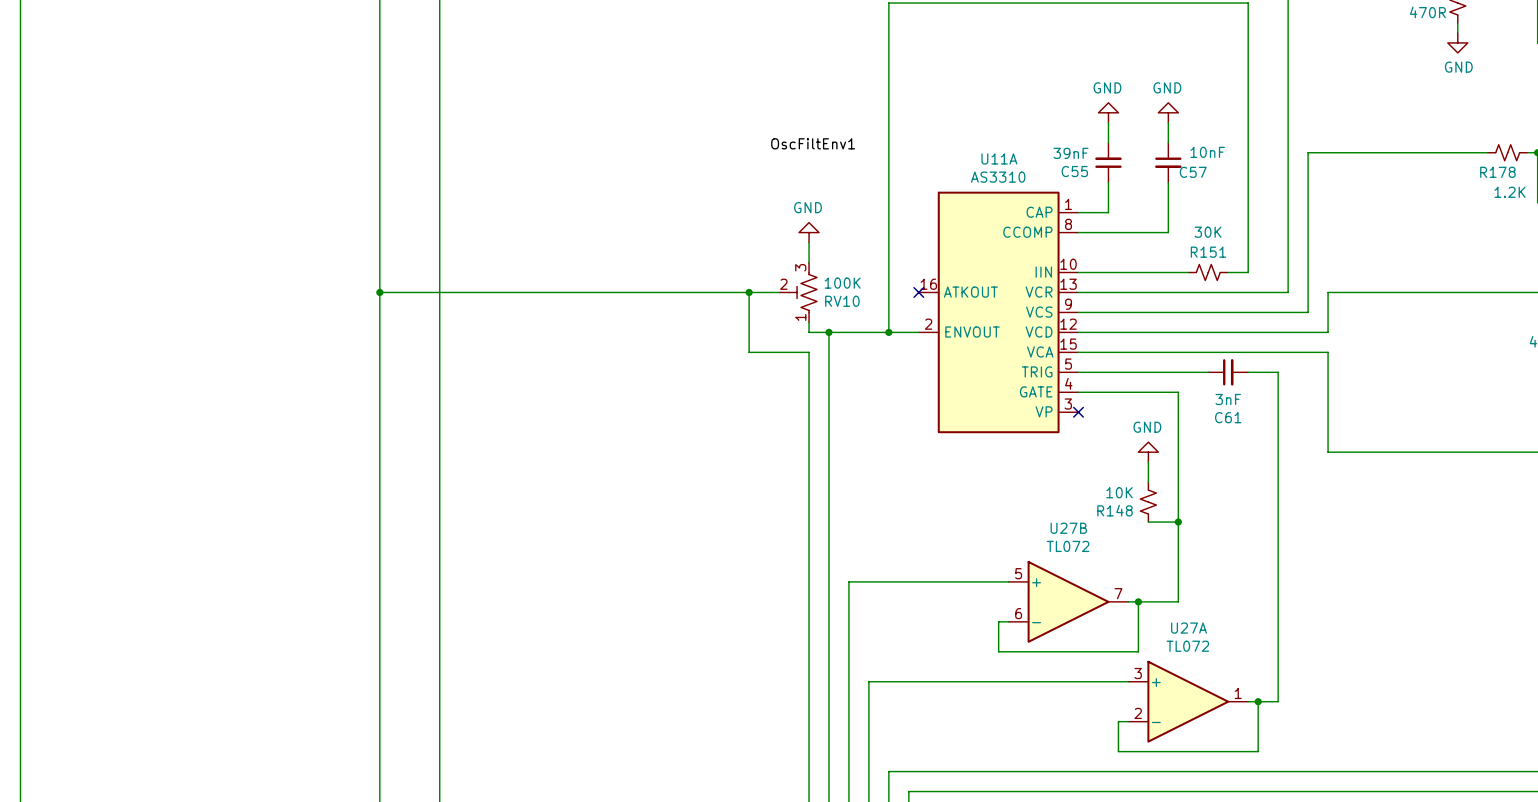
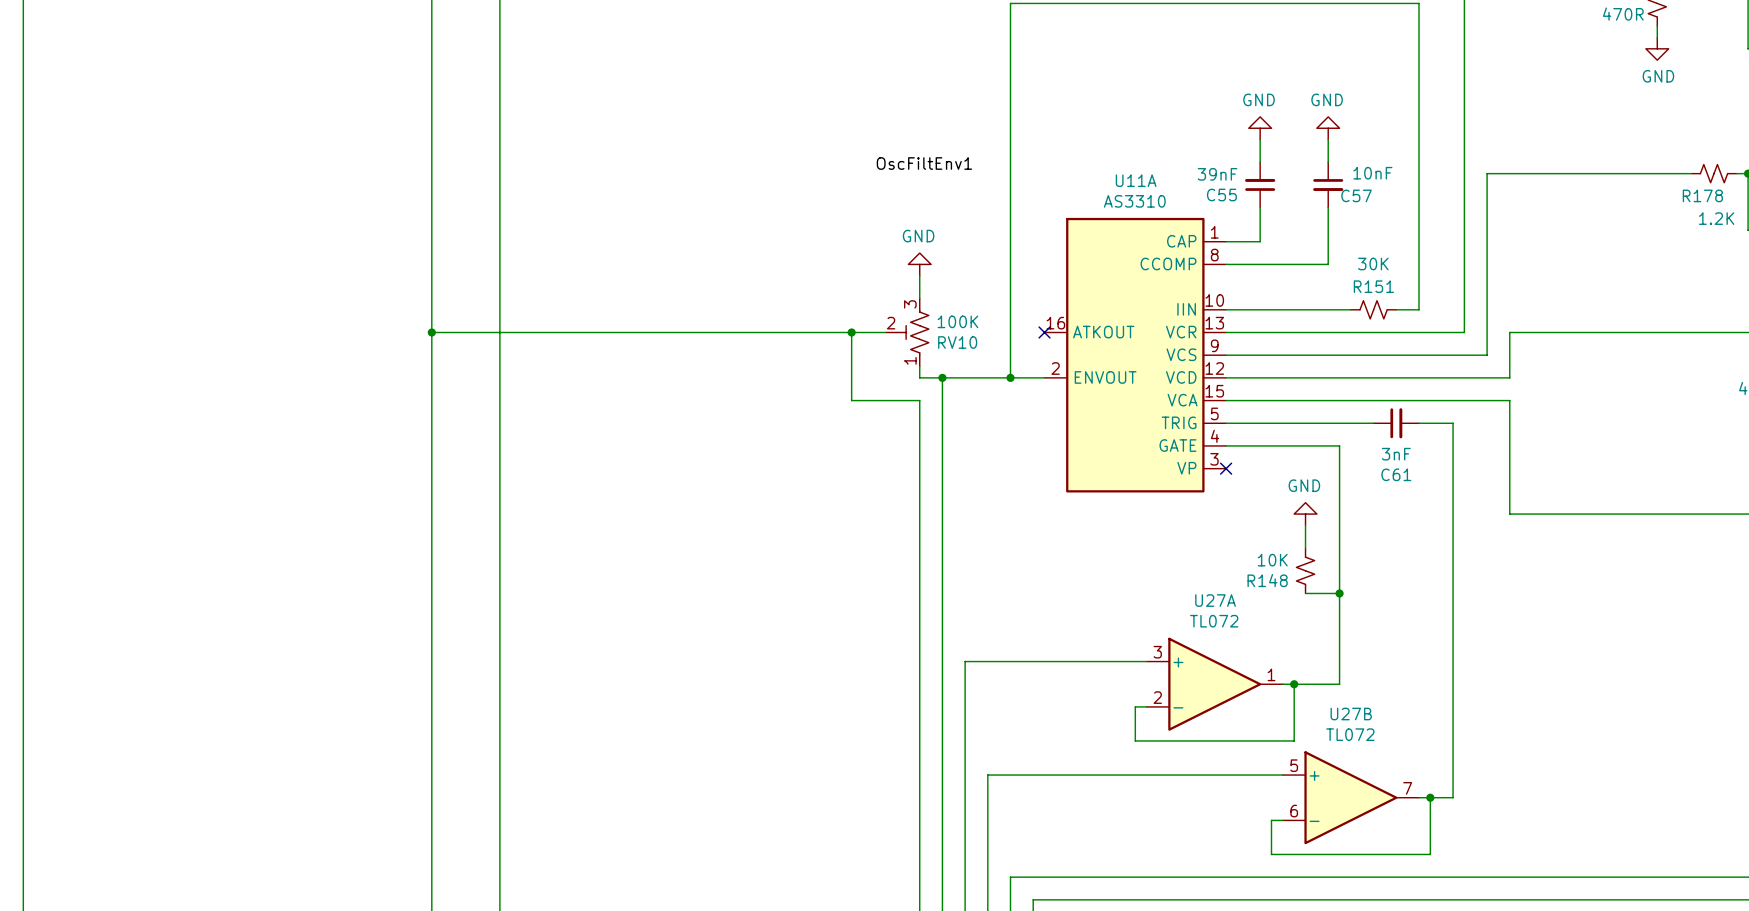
U27B position: (1068, 601) -> (1350, 797)
U27A position: (1188, 701) -> (1214, 684)

